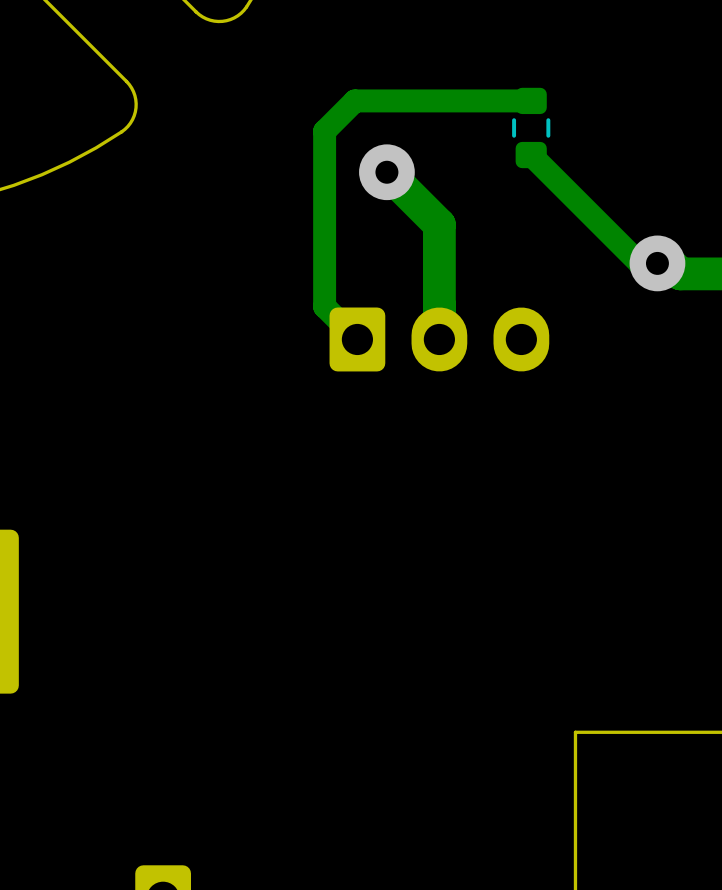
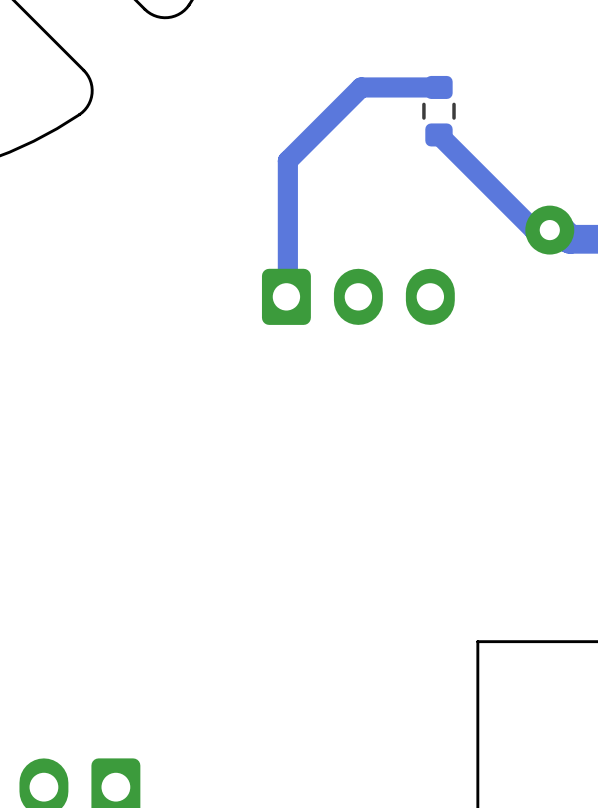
track: (442, 100) (354, 100) (324, 131) (324, 306) (357, 339) -> (361, 87) (287, 160) (286, 296)
track: (386, 172) (439, 224) (439, 339) -> none
via: (386, 172) -> none

